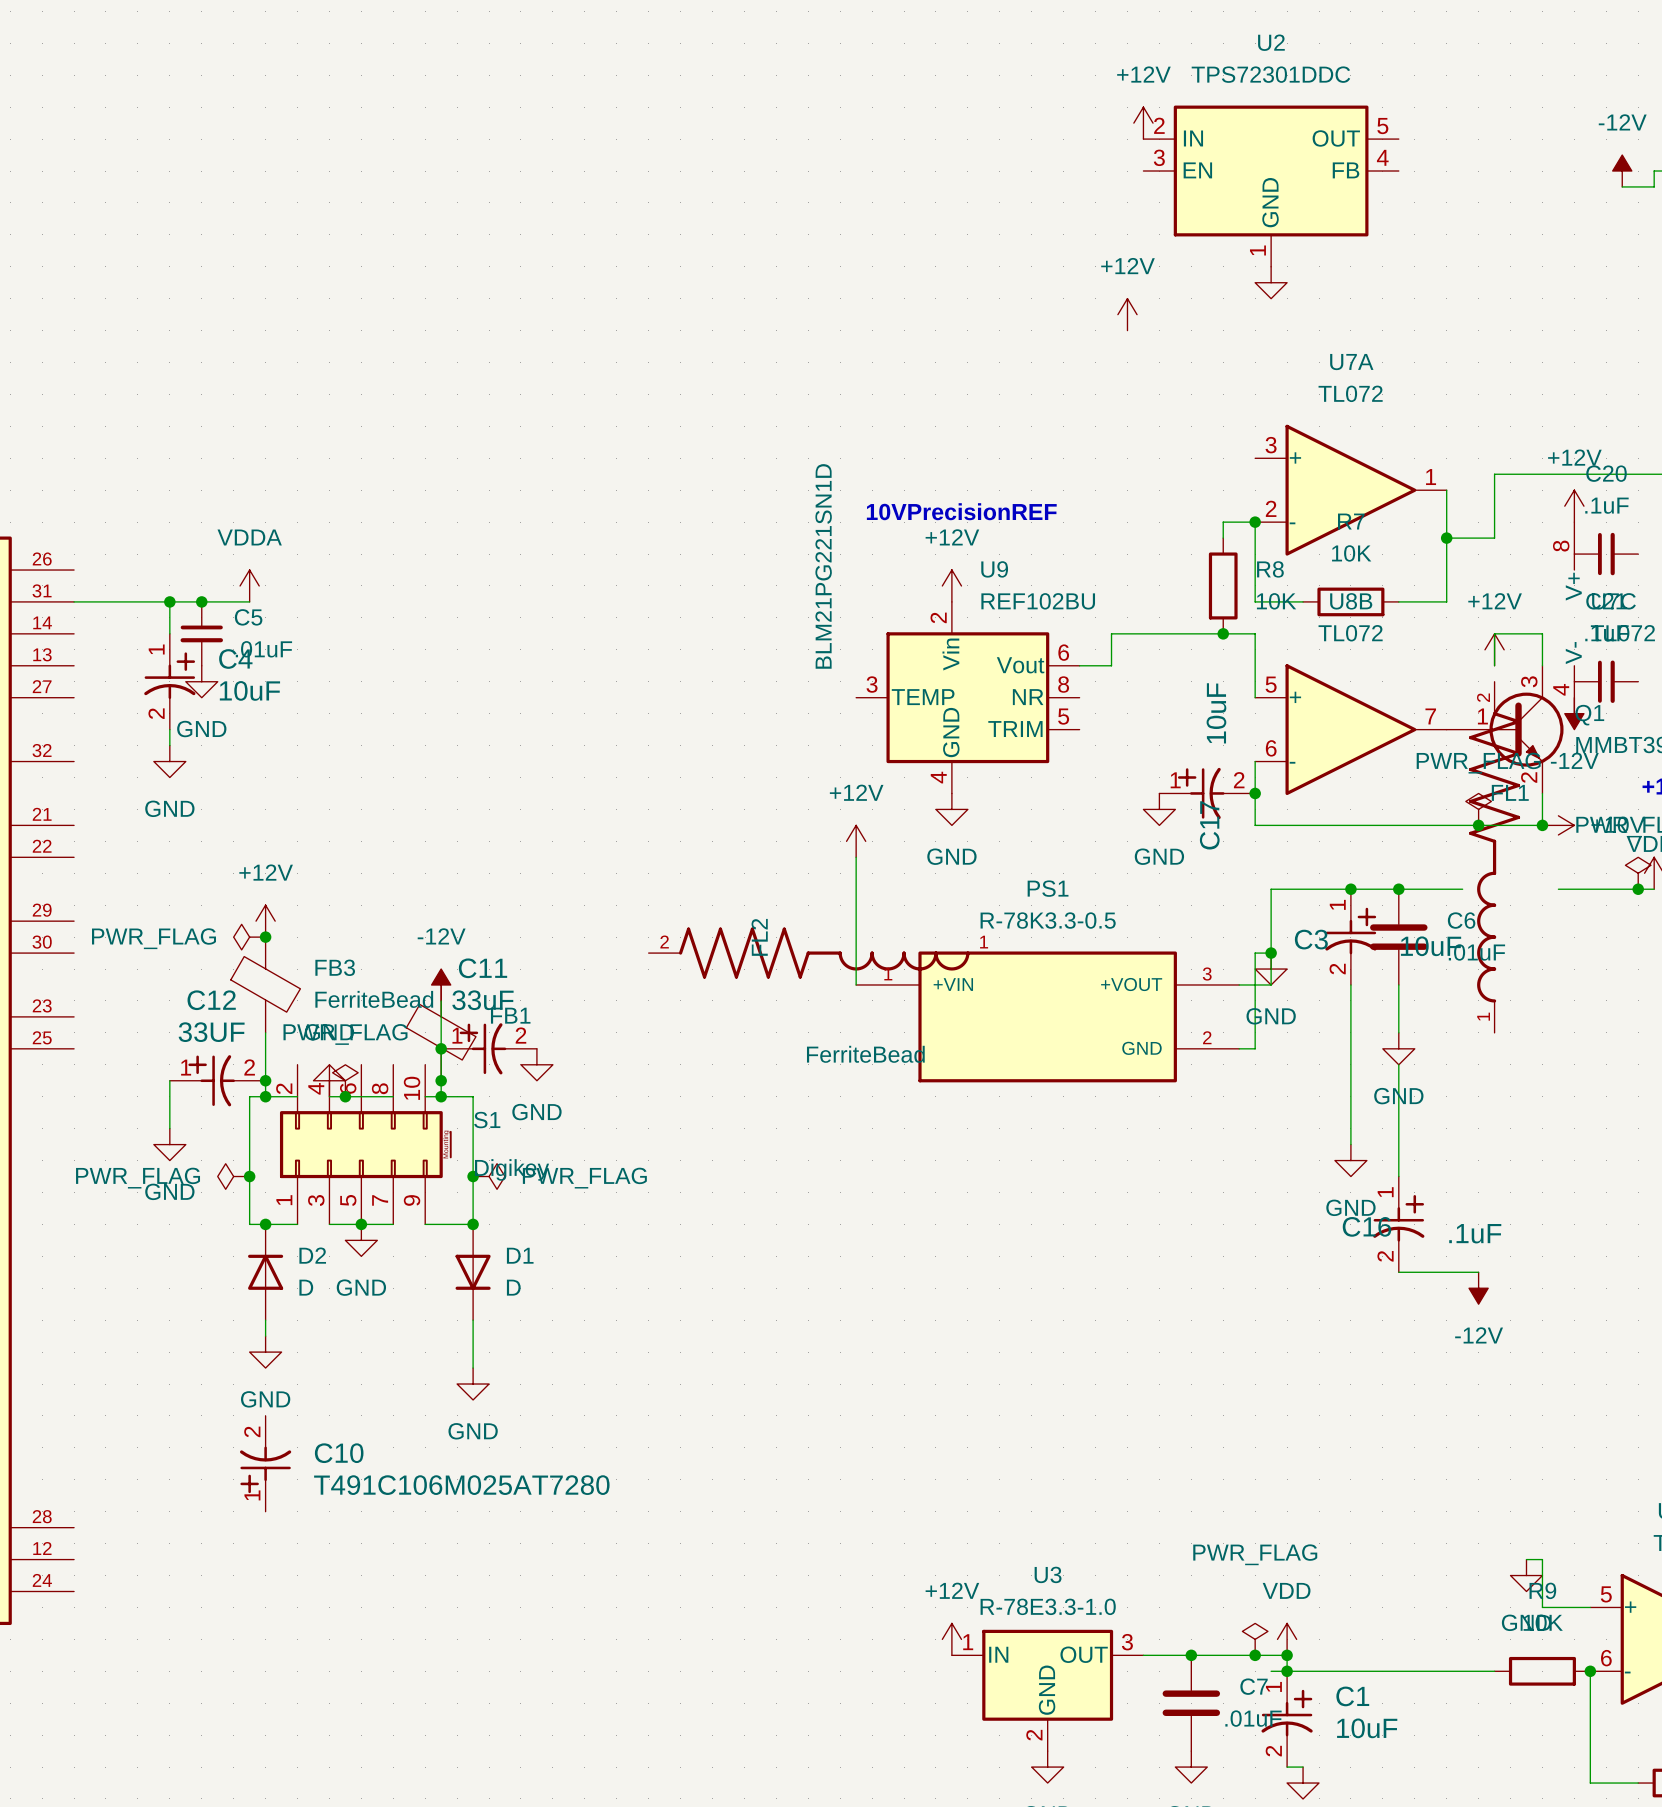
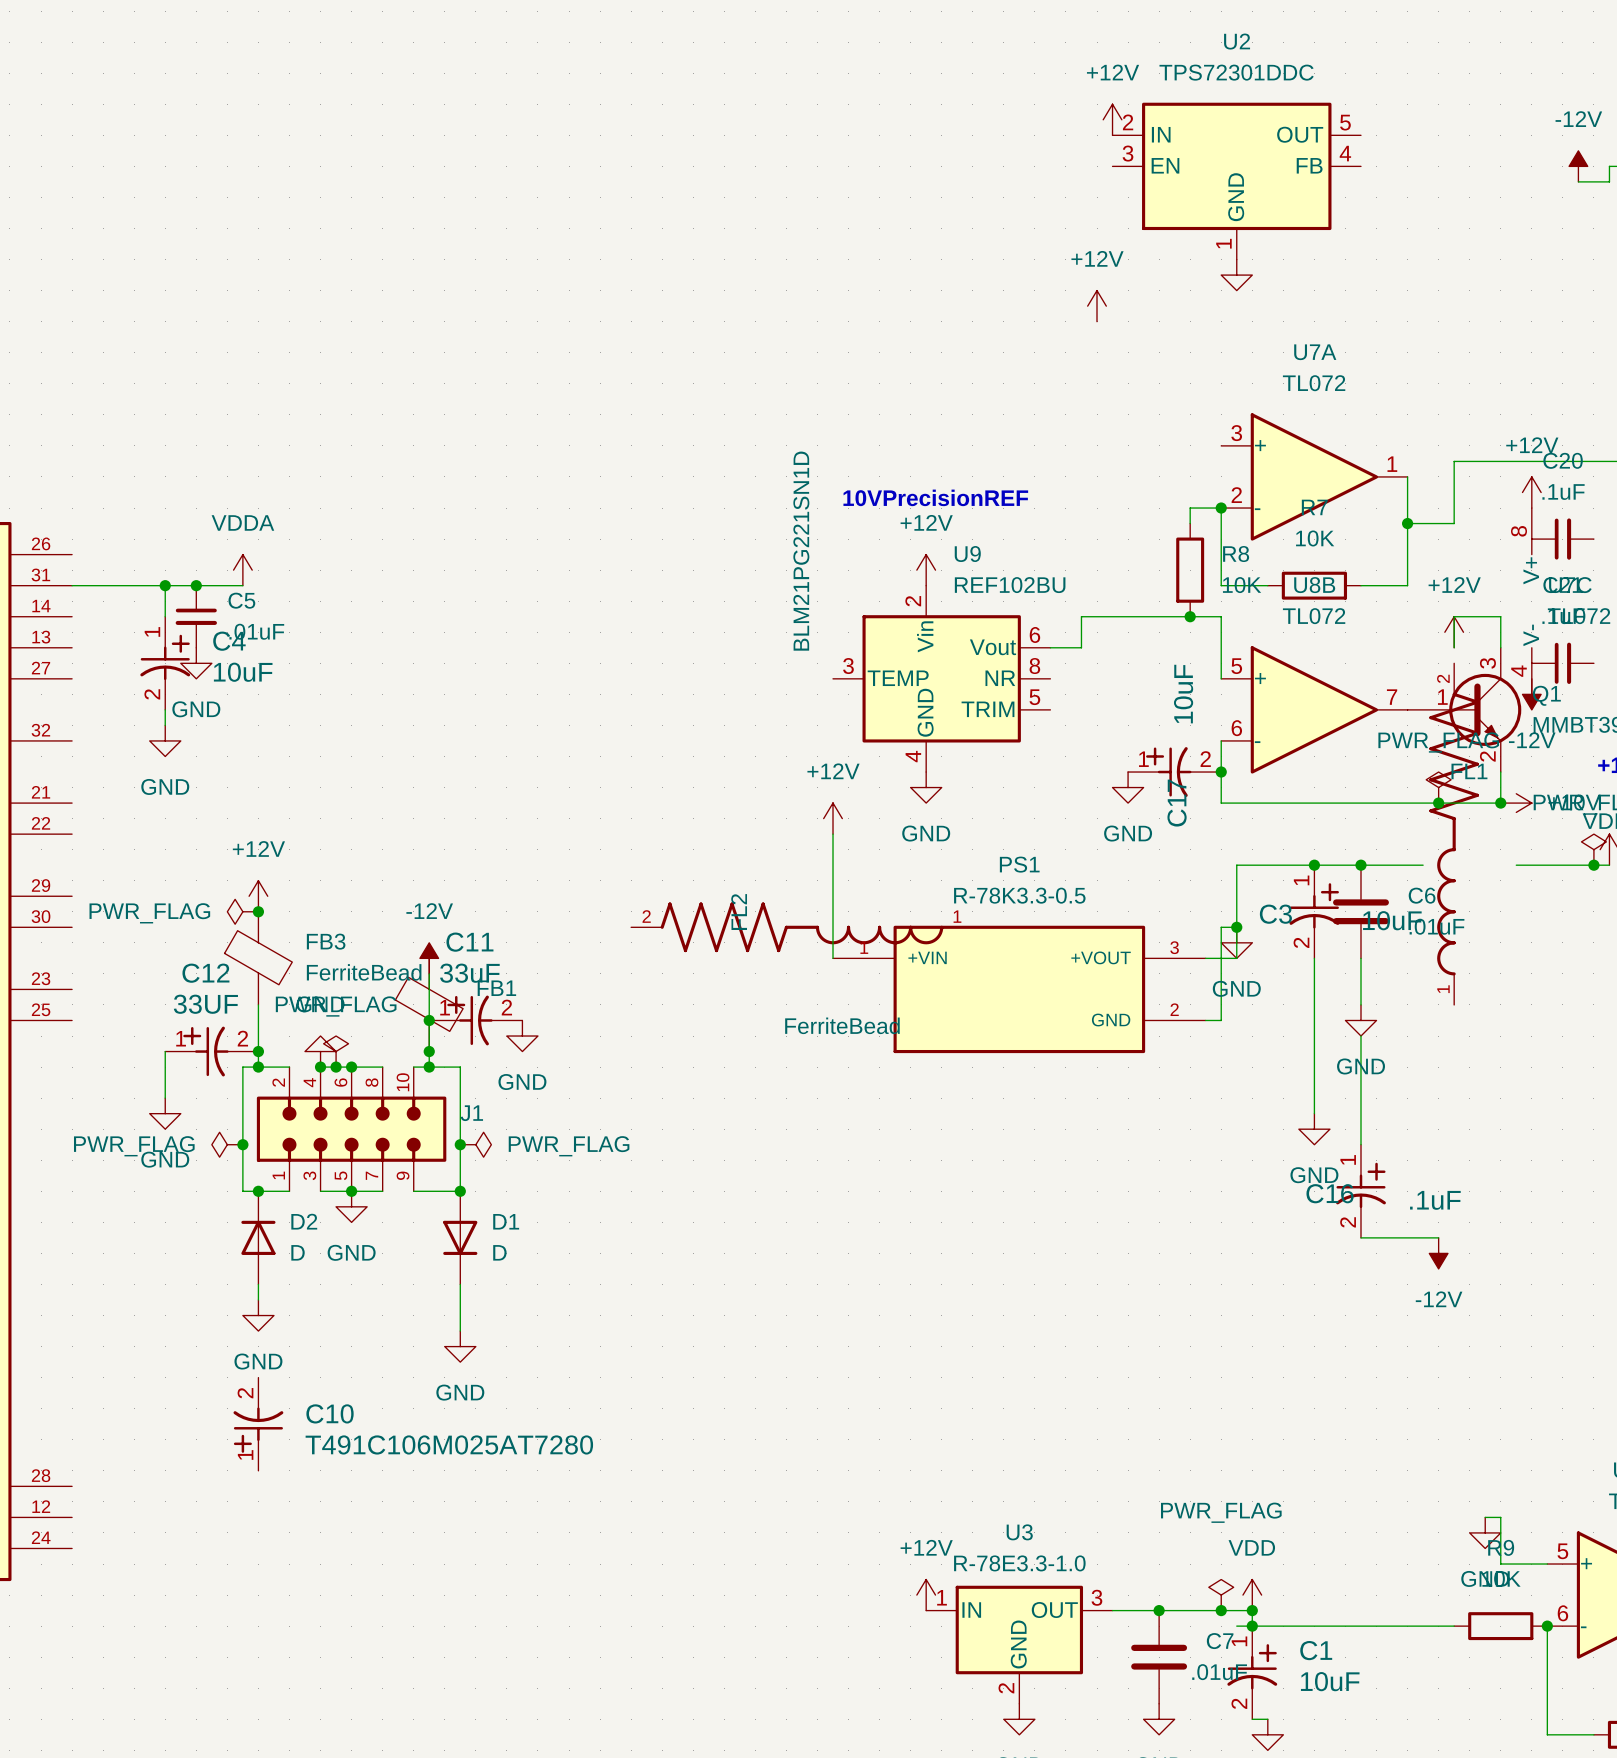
junction: none -> (320, 1067)
junction: none -> (351, 1067)
S1: (365, 1144) -> none
J1: none -> (351, 1129)

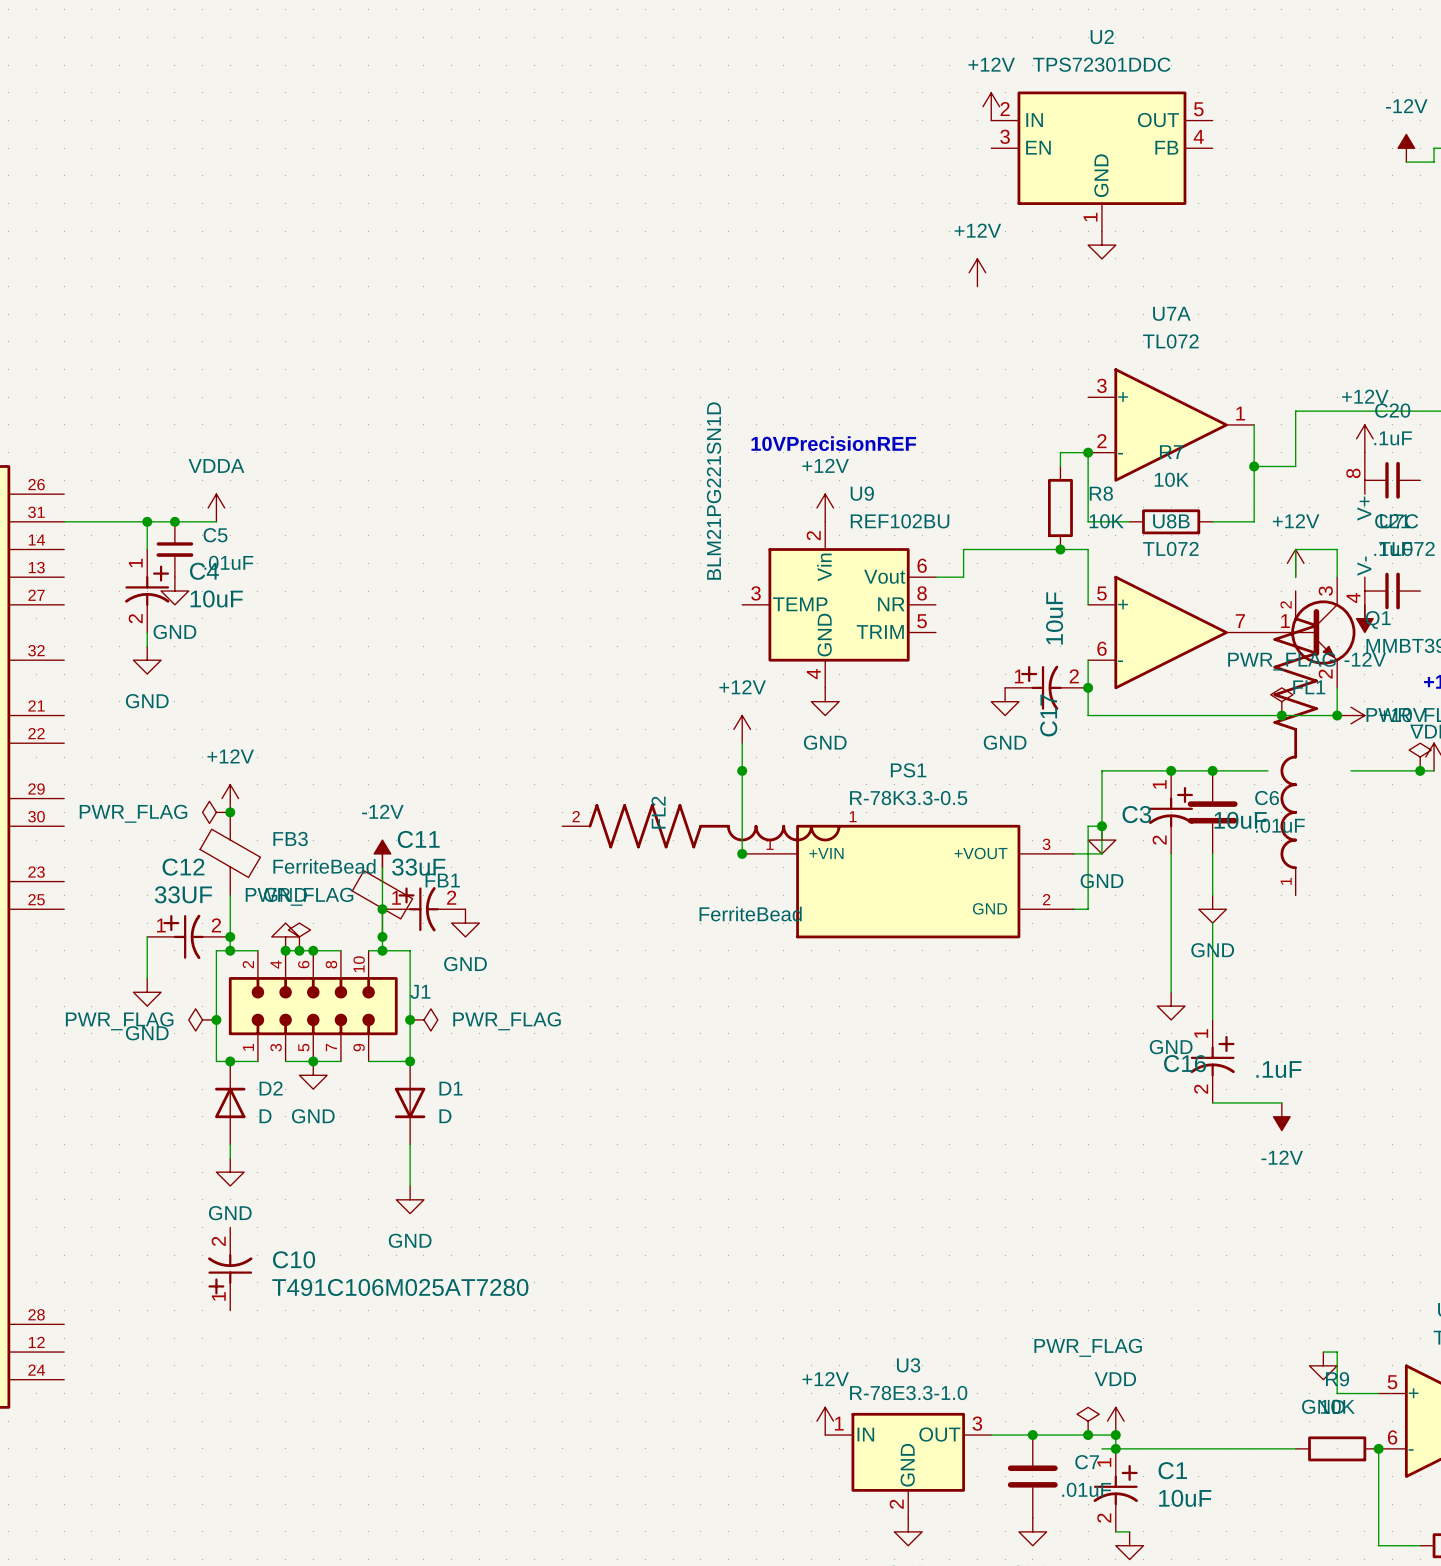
junction: none -> (742, 770)
junction: none -> (742, 853)

